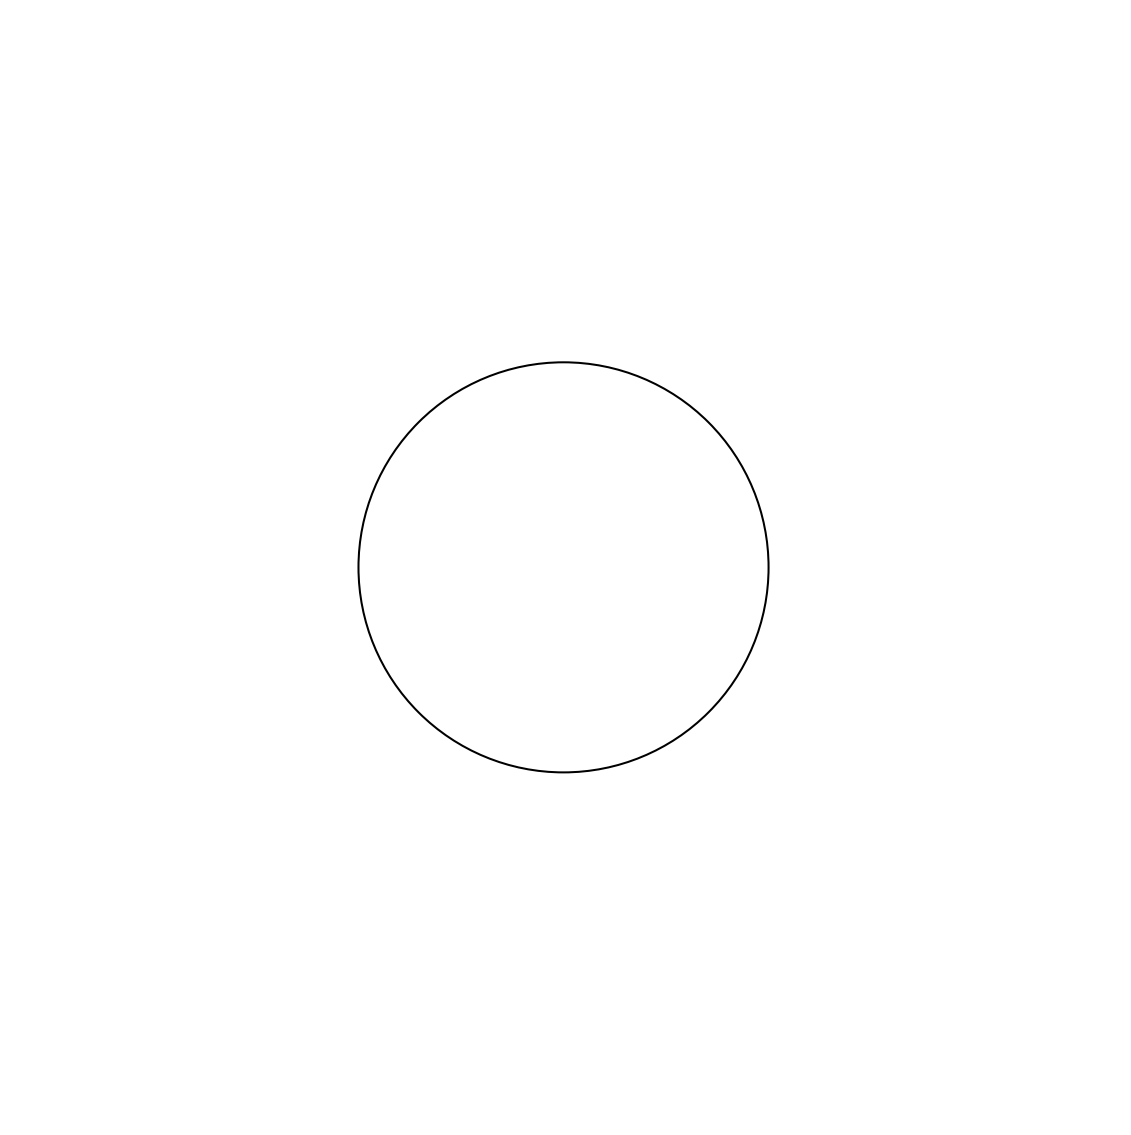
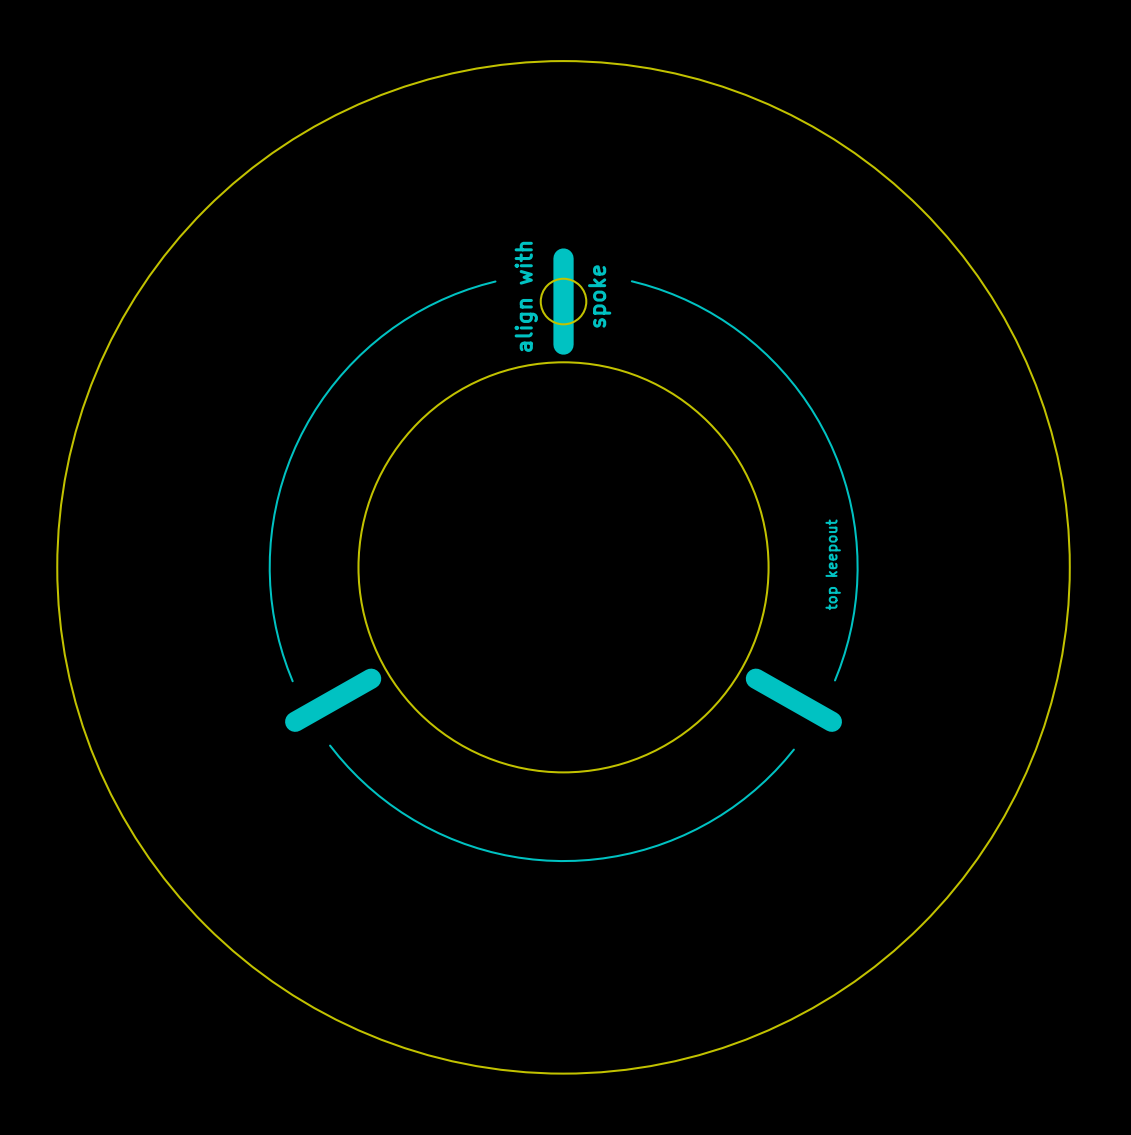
round board edge: none -> [56, 60, 1071, 1075]
line: none -> (563, 258) (563, 344)
round board edge: none -> [539, 277, 588, 326]
line: none -> (495, 281) (468, 289) (429, 306) (381, 336) (360, 355) (331, 386) (301, 434) (289, 460) (277, 500) (269, 556) (270, 585) (275, 627) (292, 681)
line: none -> (631, 281) (685, 299) (722, 319) (745, 336) (786, 375) (803, 397) (825, 433) (842, 473) (849, 500) (857, 556) (854, 612) (848, 640) (834, 680)
text: none -> align with (526, 296)
text: none -> spoke (599, 296)
text: none -> top keepout (833, 564)
line: none -> (371, 678) (295, 721)
line: none -> (755, 678) (831, 721)
line: none -> (330, 745) (348, 767) (378, 795) (425, 826) (451, 838) (491, 852) (518, 857) (560, 861) (589, 859) (630, 853) (670, 840) (696, 829) (744, 799) (775, 770) (793, 749)

